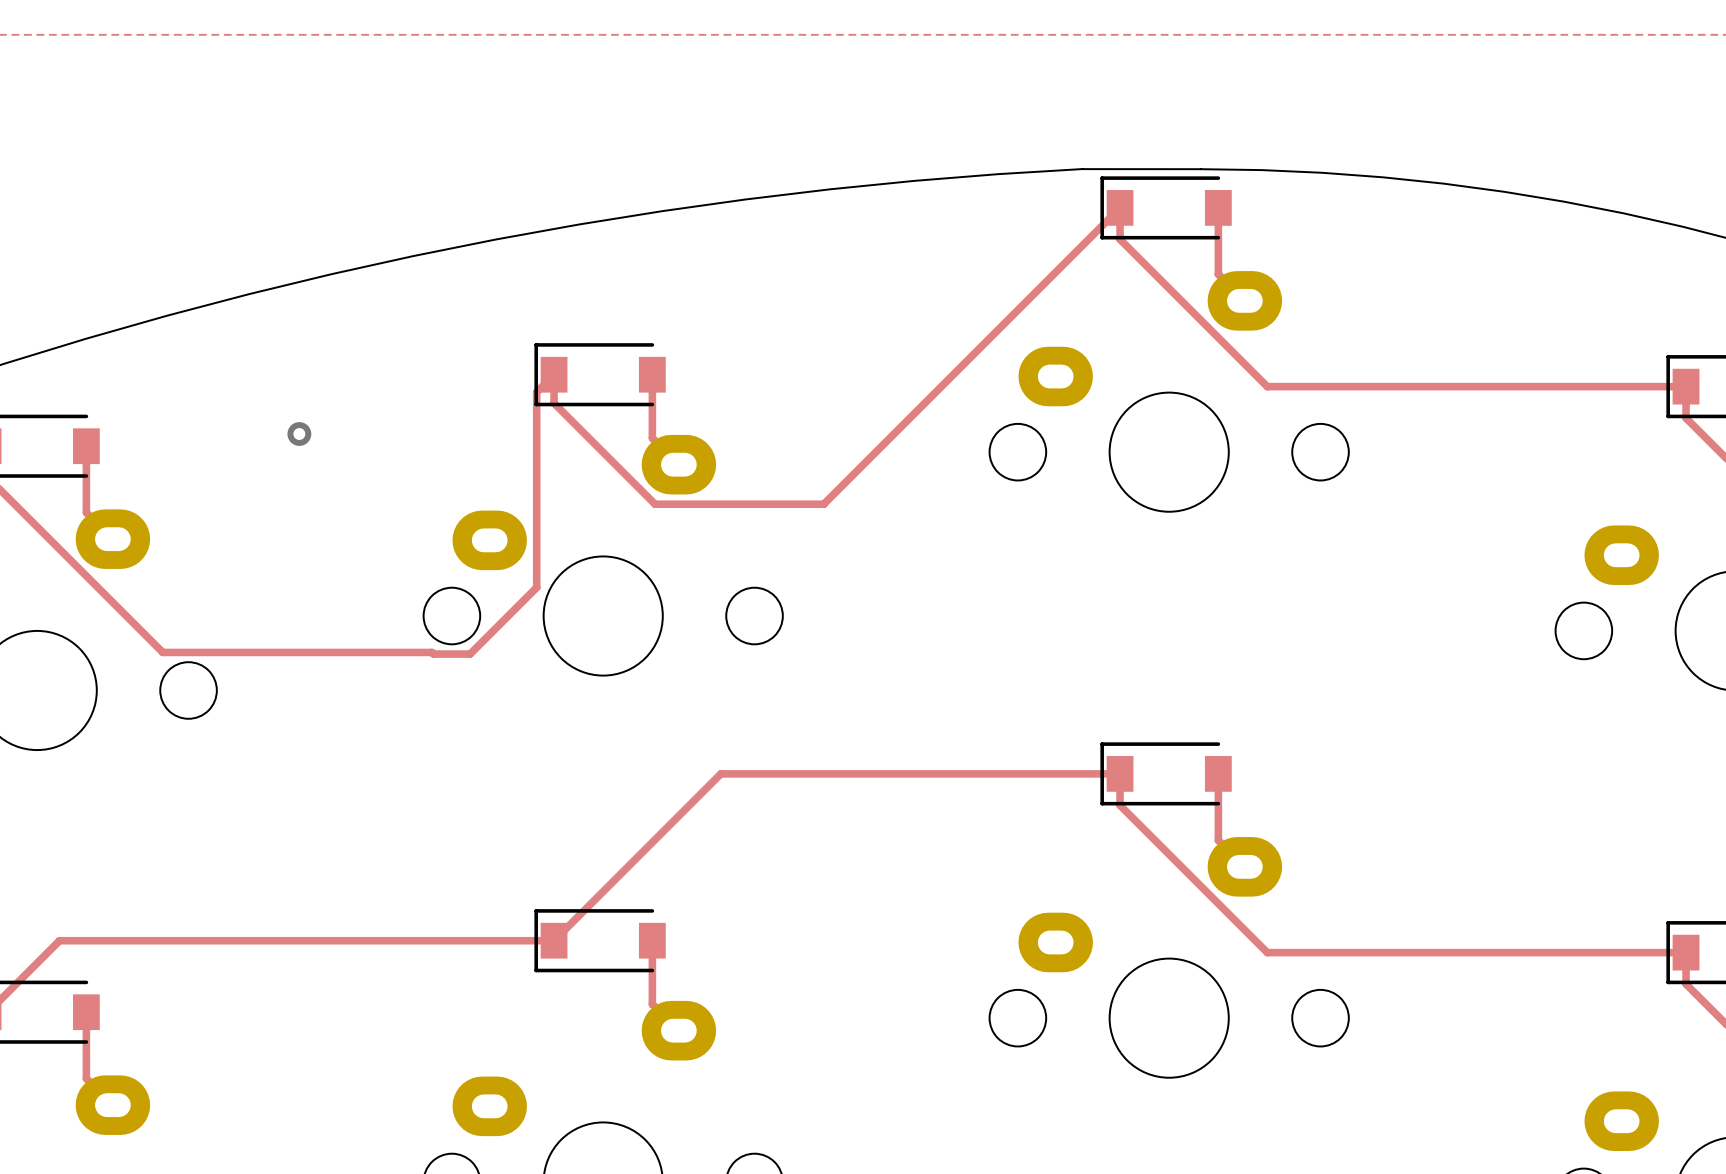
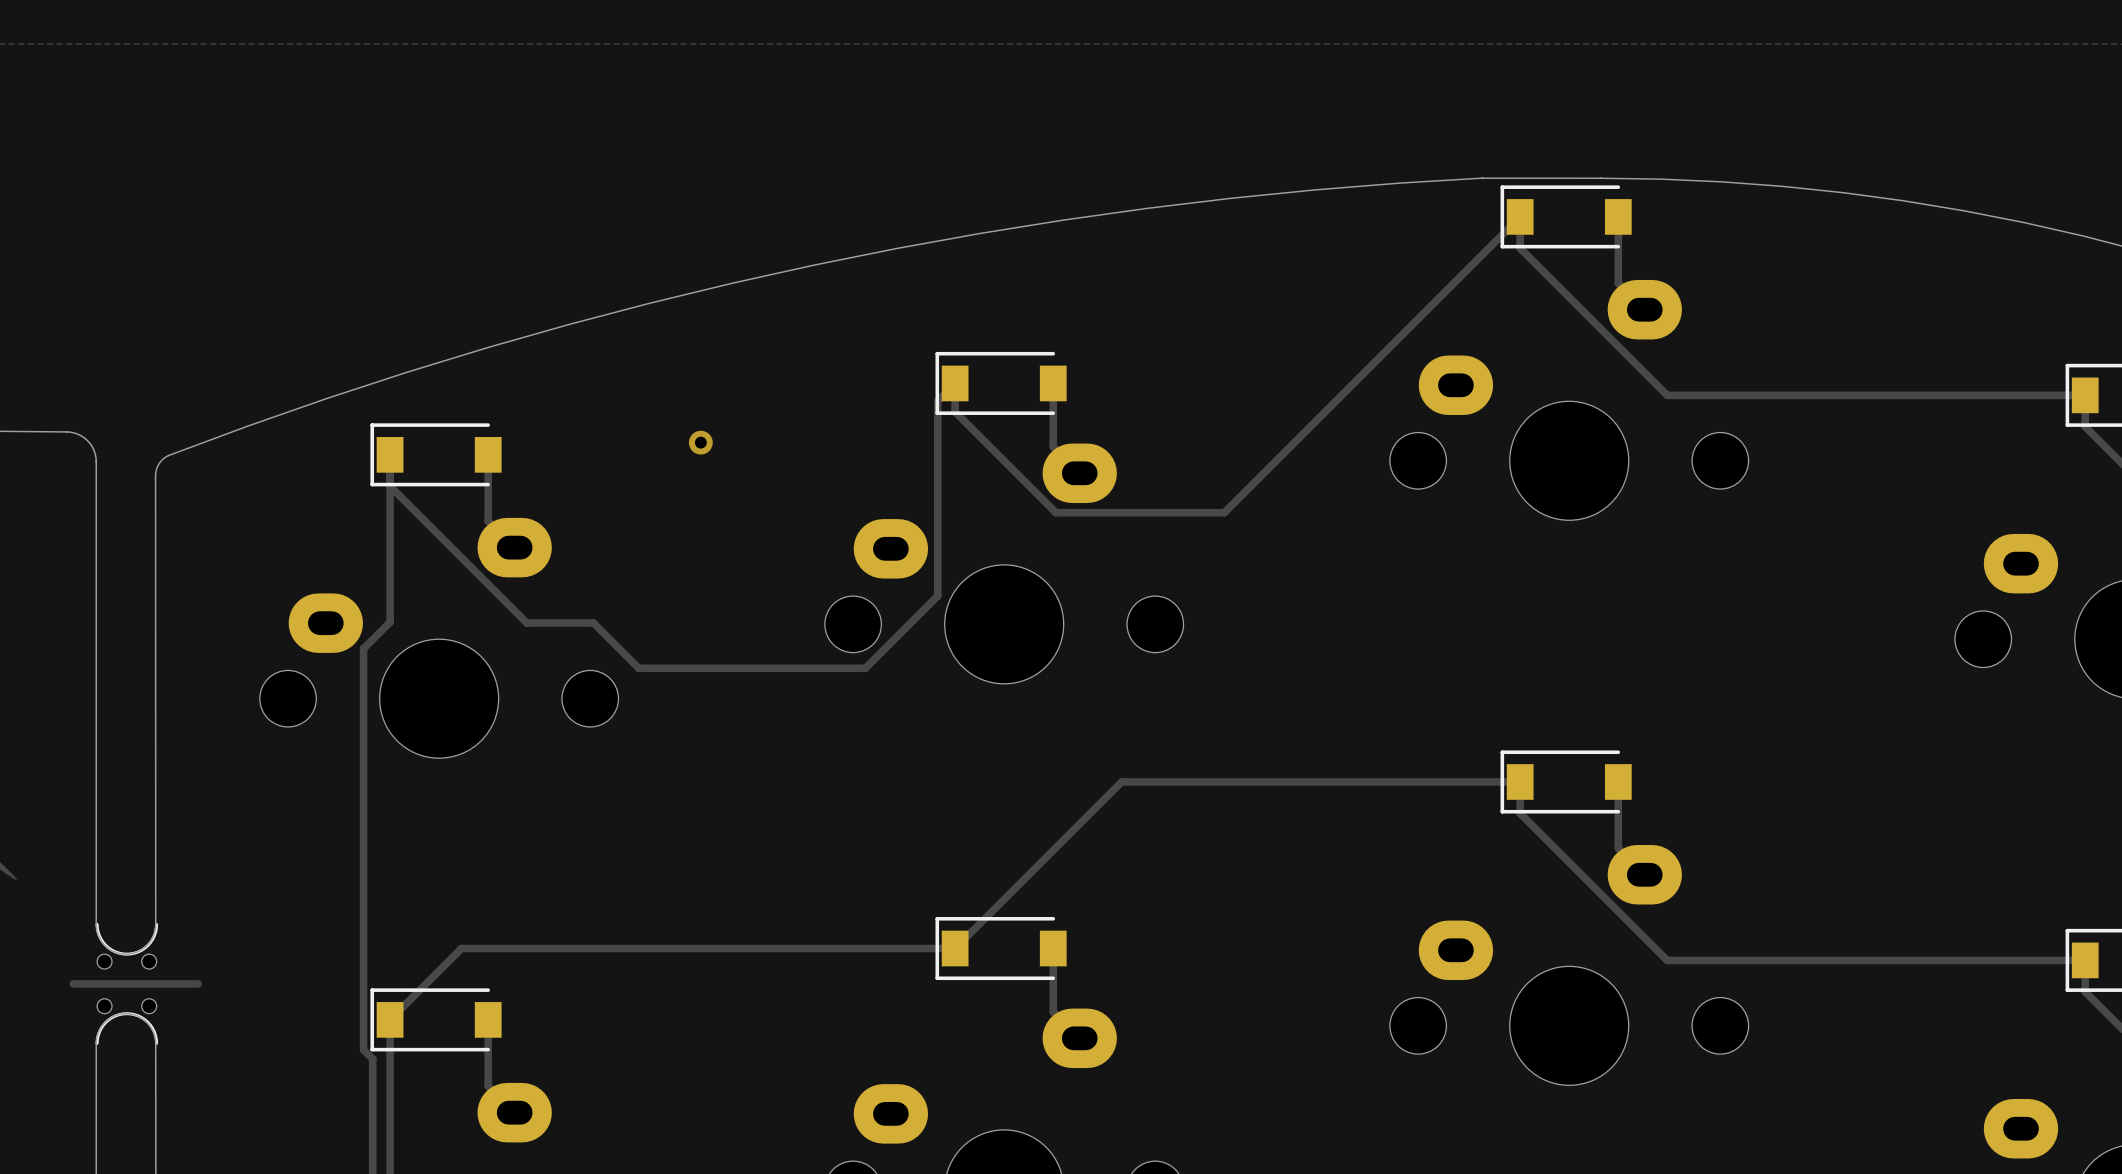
track: (125, 614) (162, 652) (470, 654) -> (526, 622) (593, 622) (638, 668) (865, 668) (871, 662)

